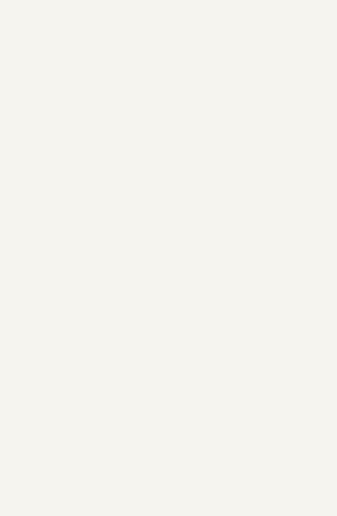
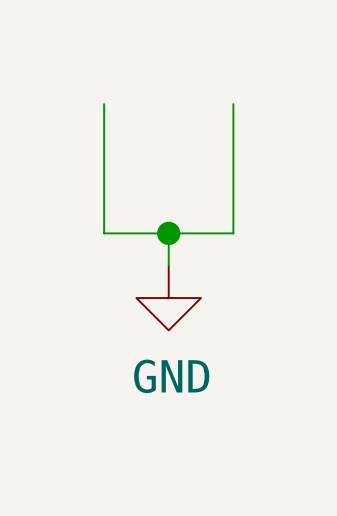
wire: none -> (104, 104) (104, 233) (233, 233) (233, 104)
wire: none -> (168, 233) (168, 265)
junction: none -> (168, 233)
power symbol: none -> GND (168, 298)

